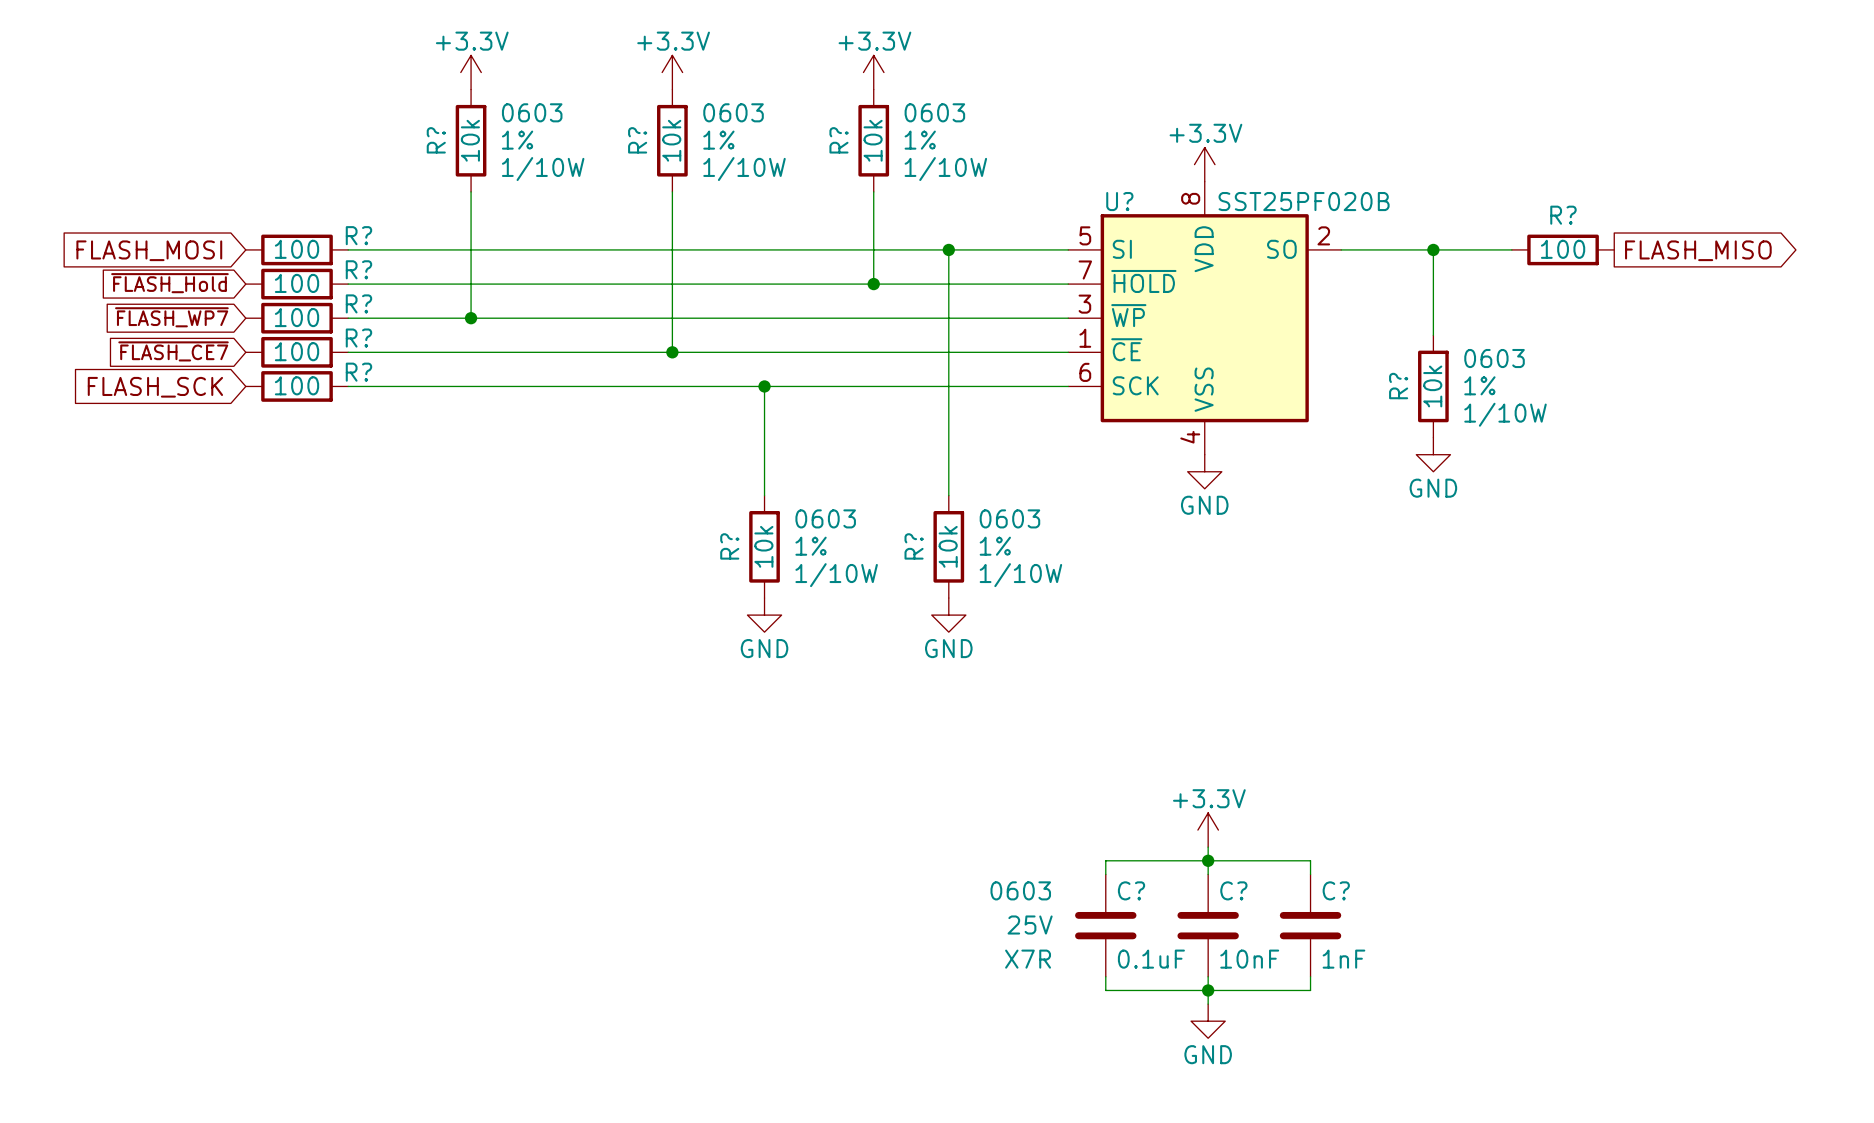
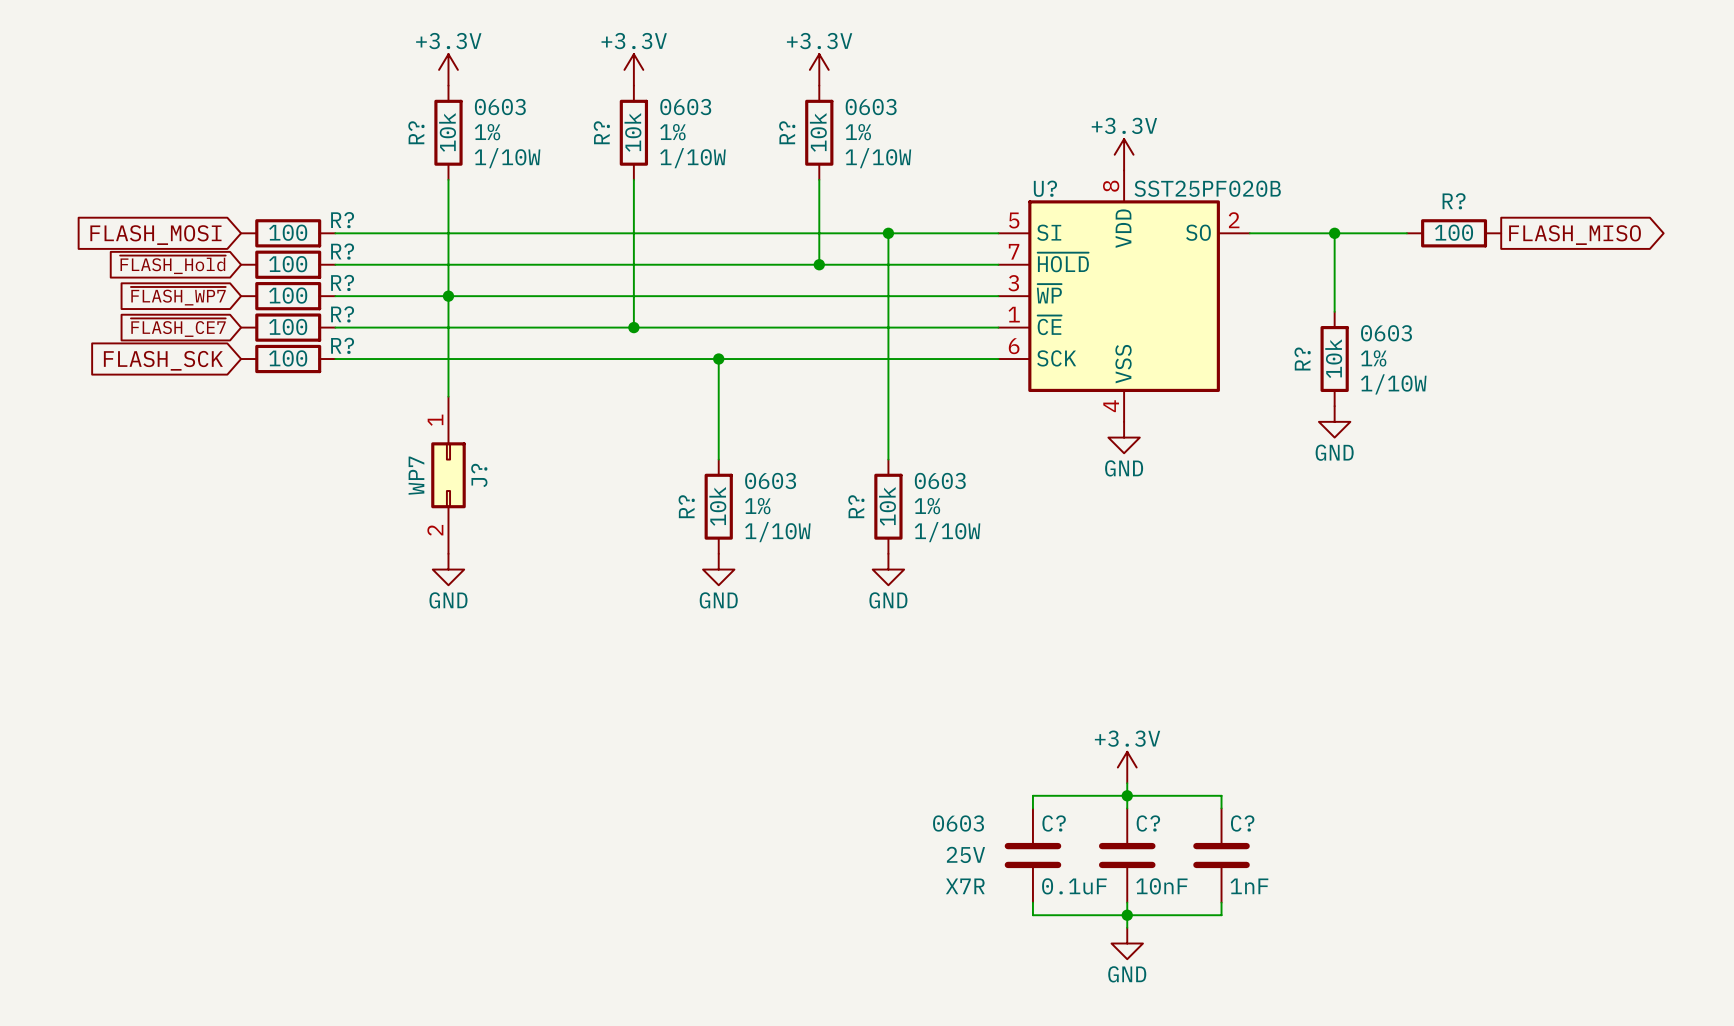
wire: none -> (448, 296) (448, 396)
J?: none -> WP7 (448, 475)
power symbol: none -> GND (448, 569)

